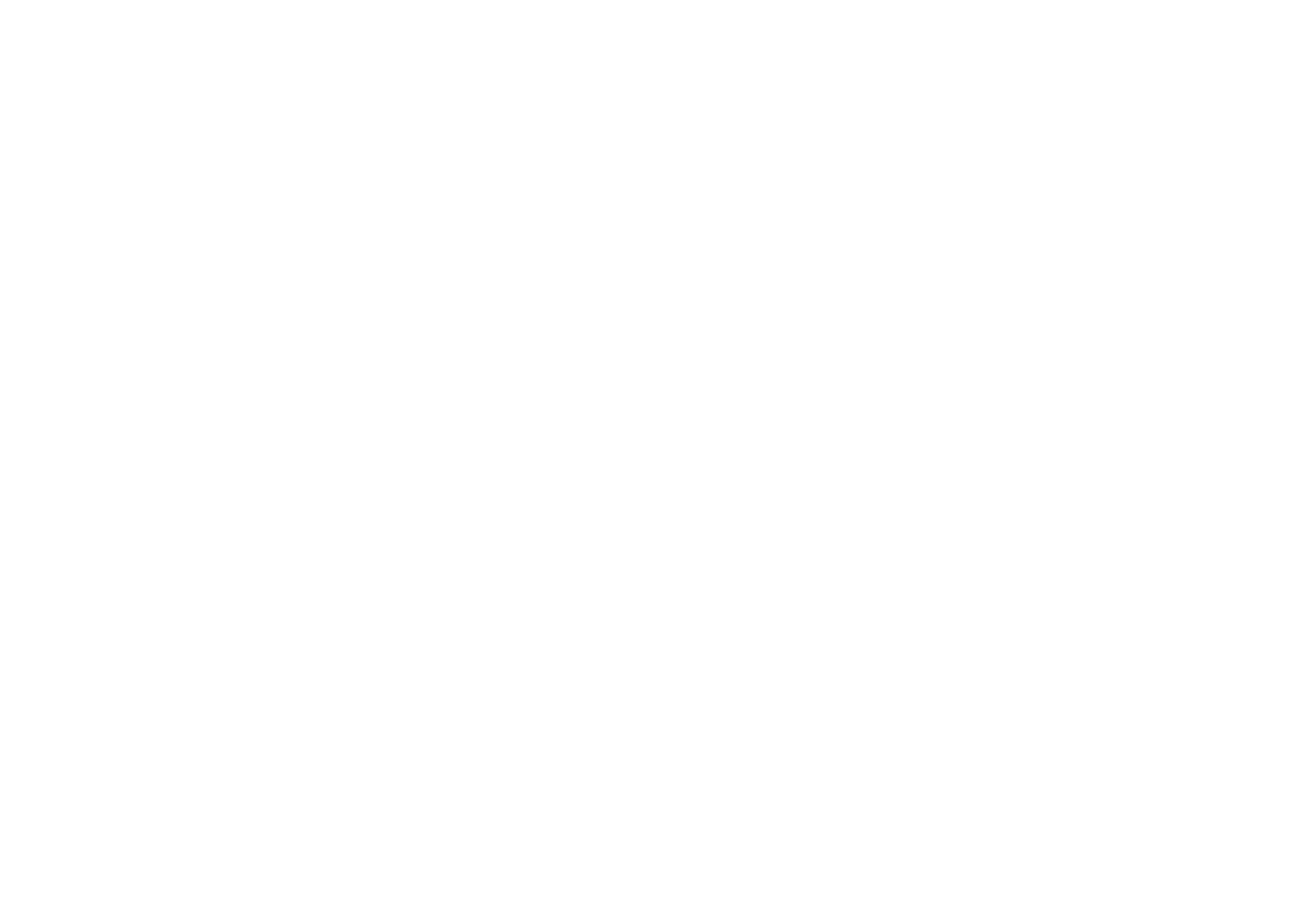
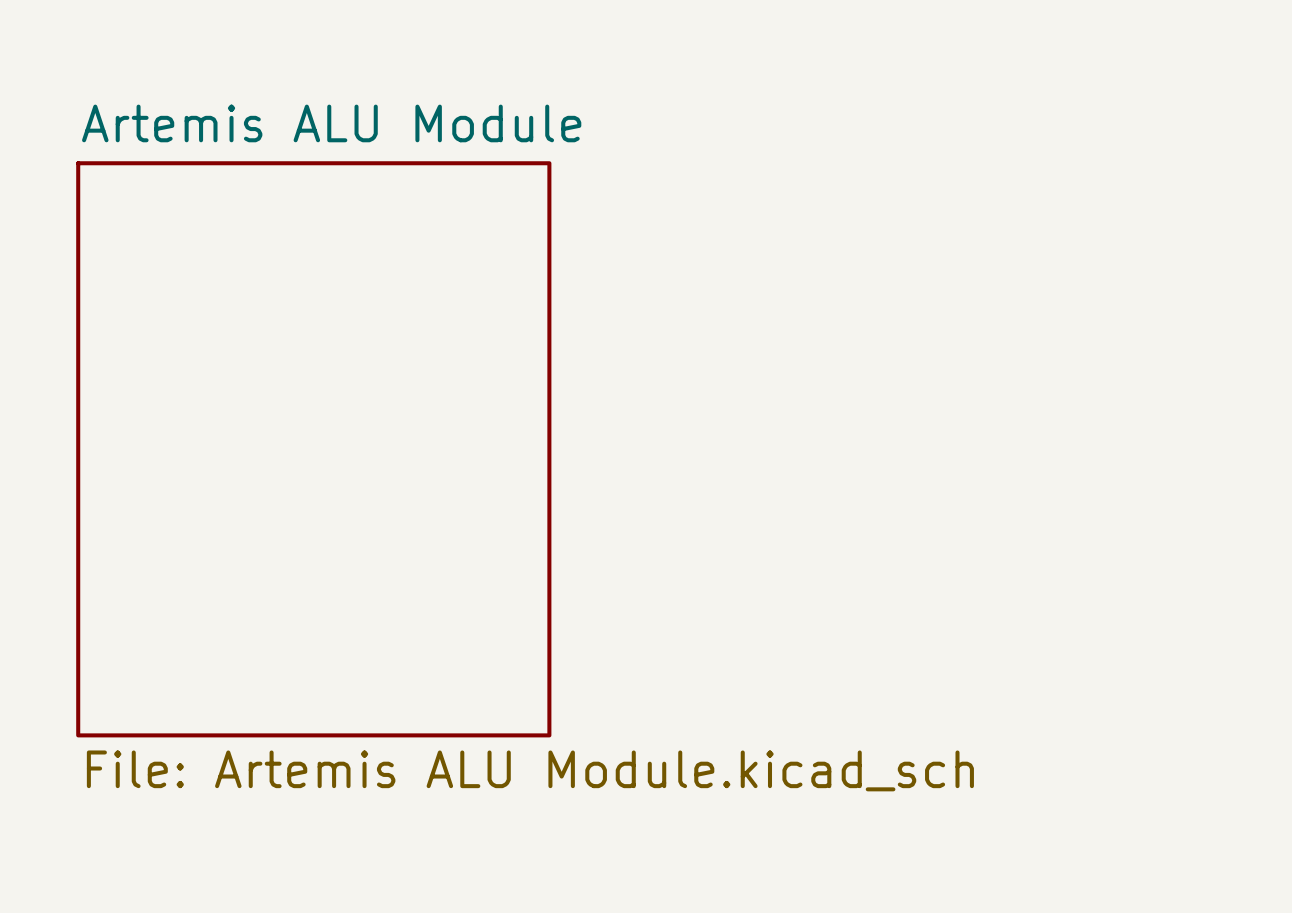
sheet Artemis ALU Module: none -> File: Artemis ALU Module.kicad_sch (313, 449)

